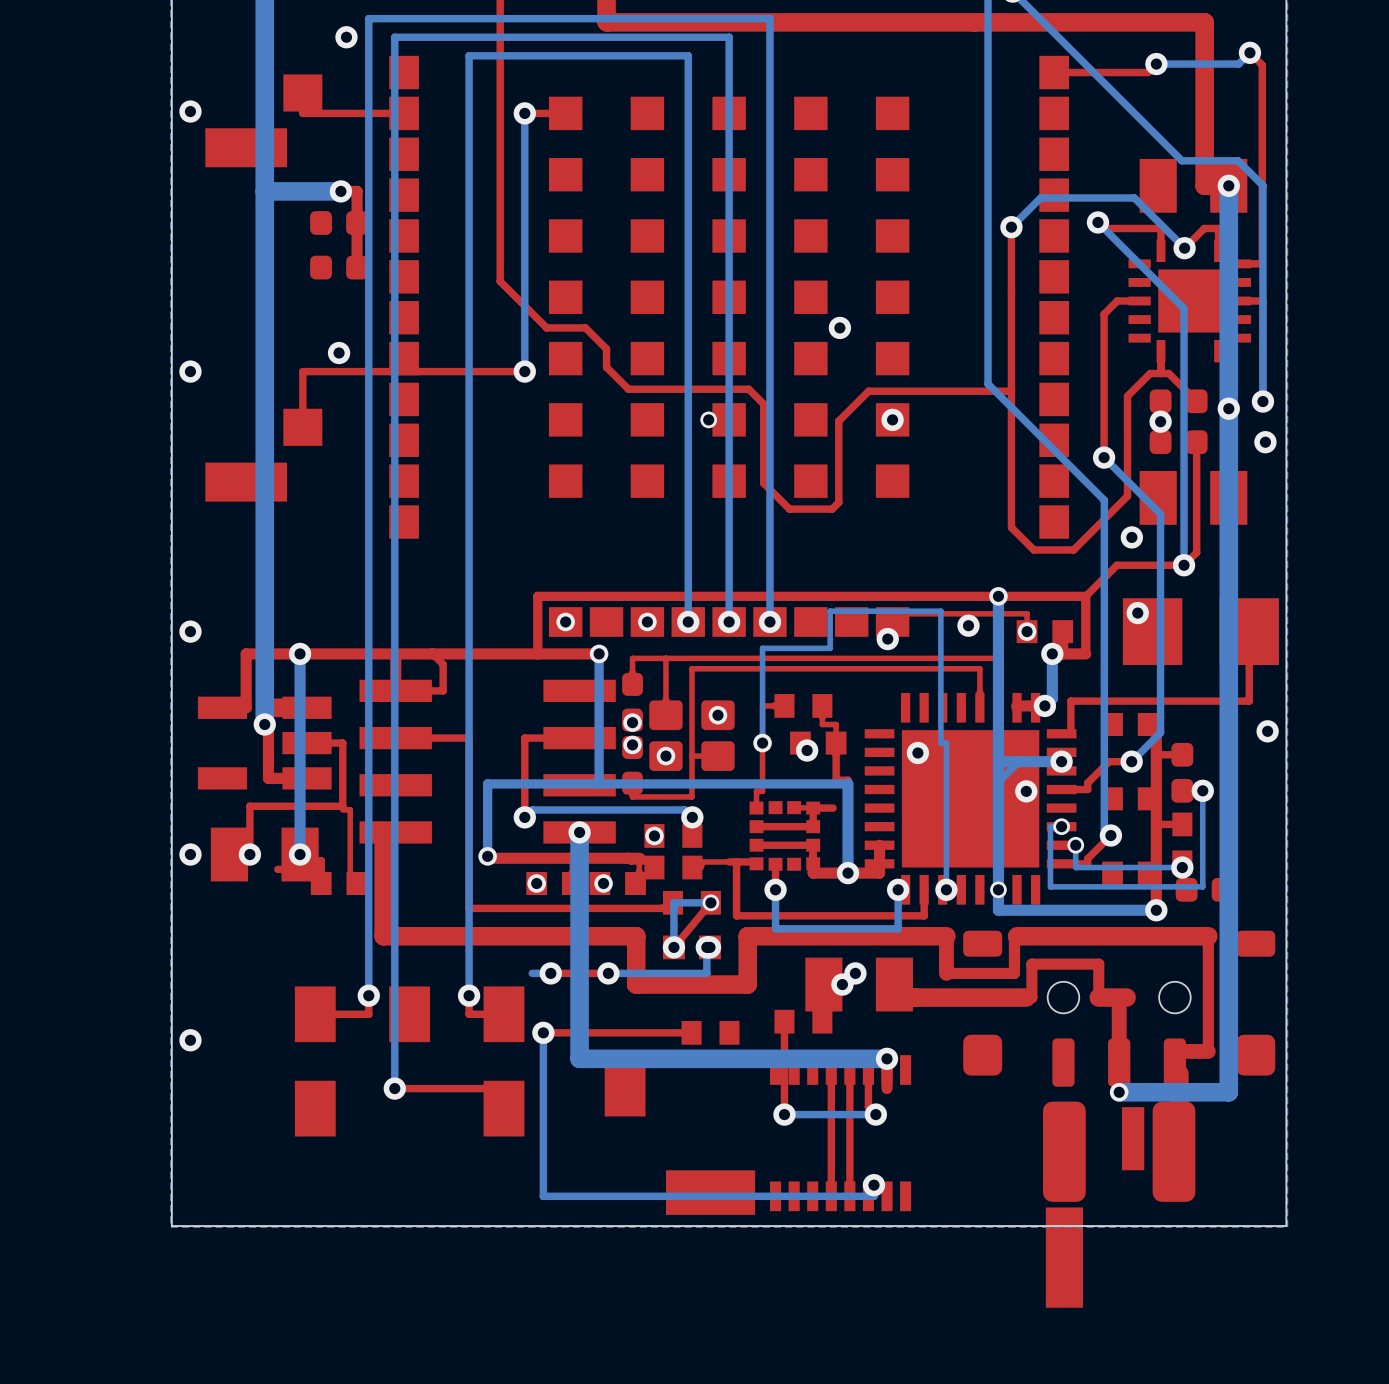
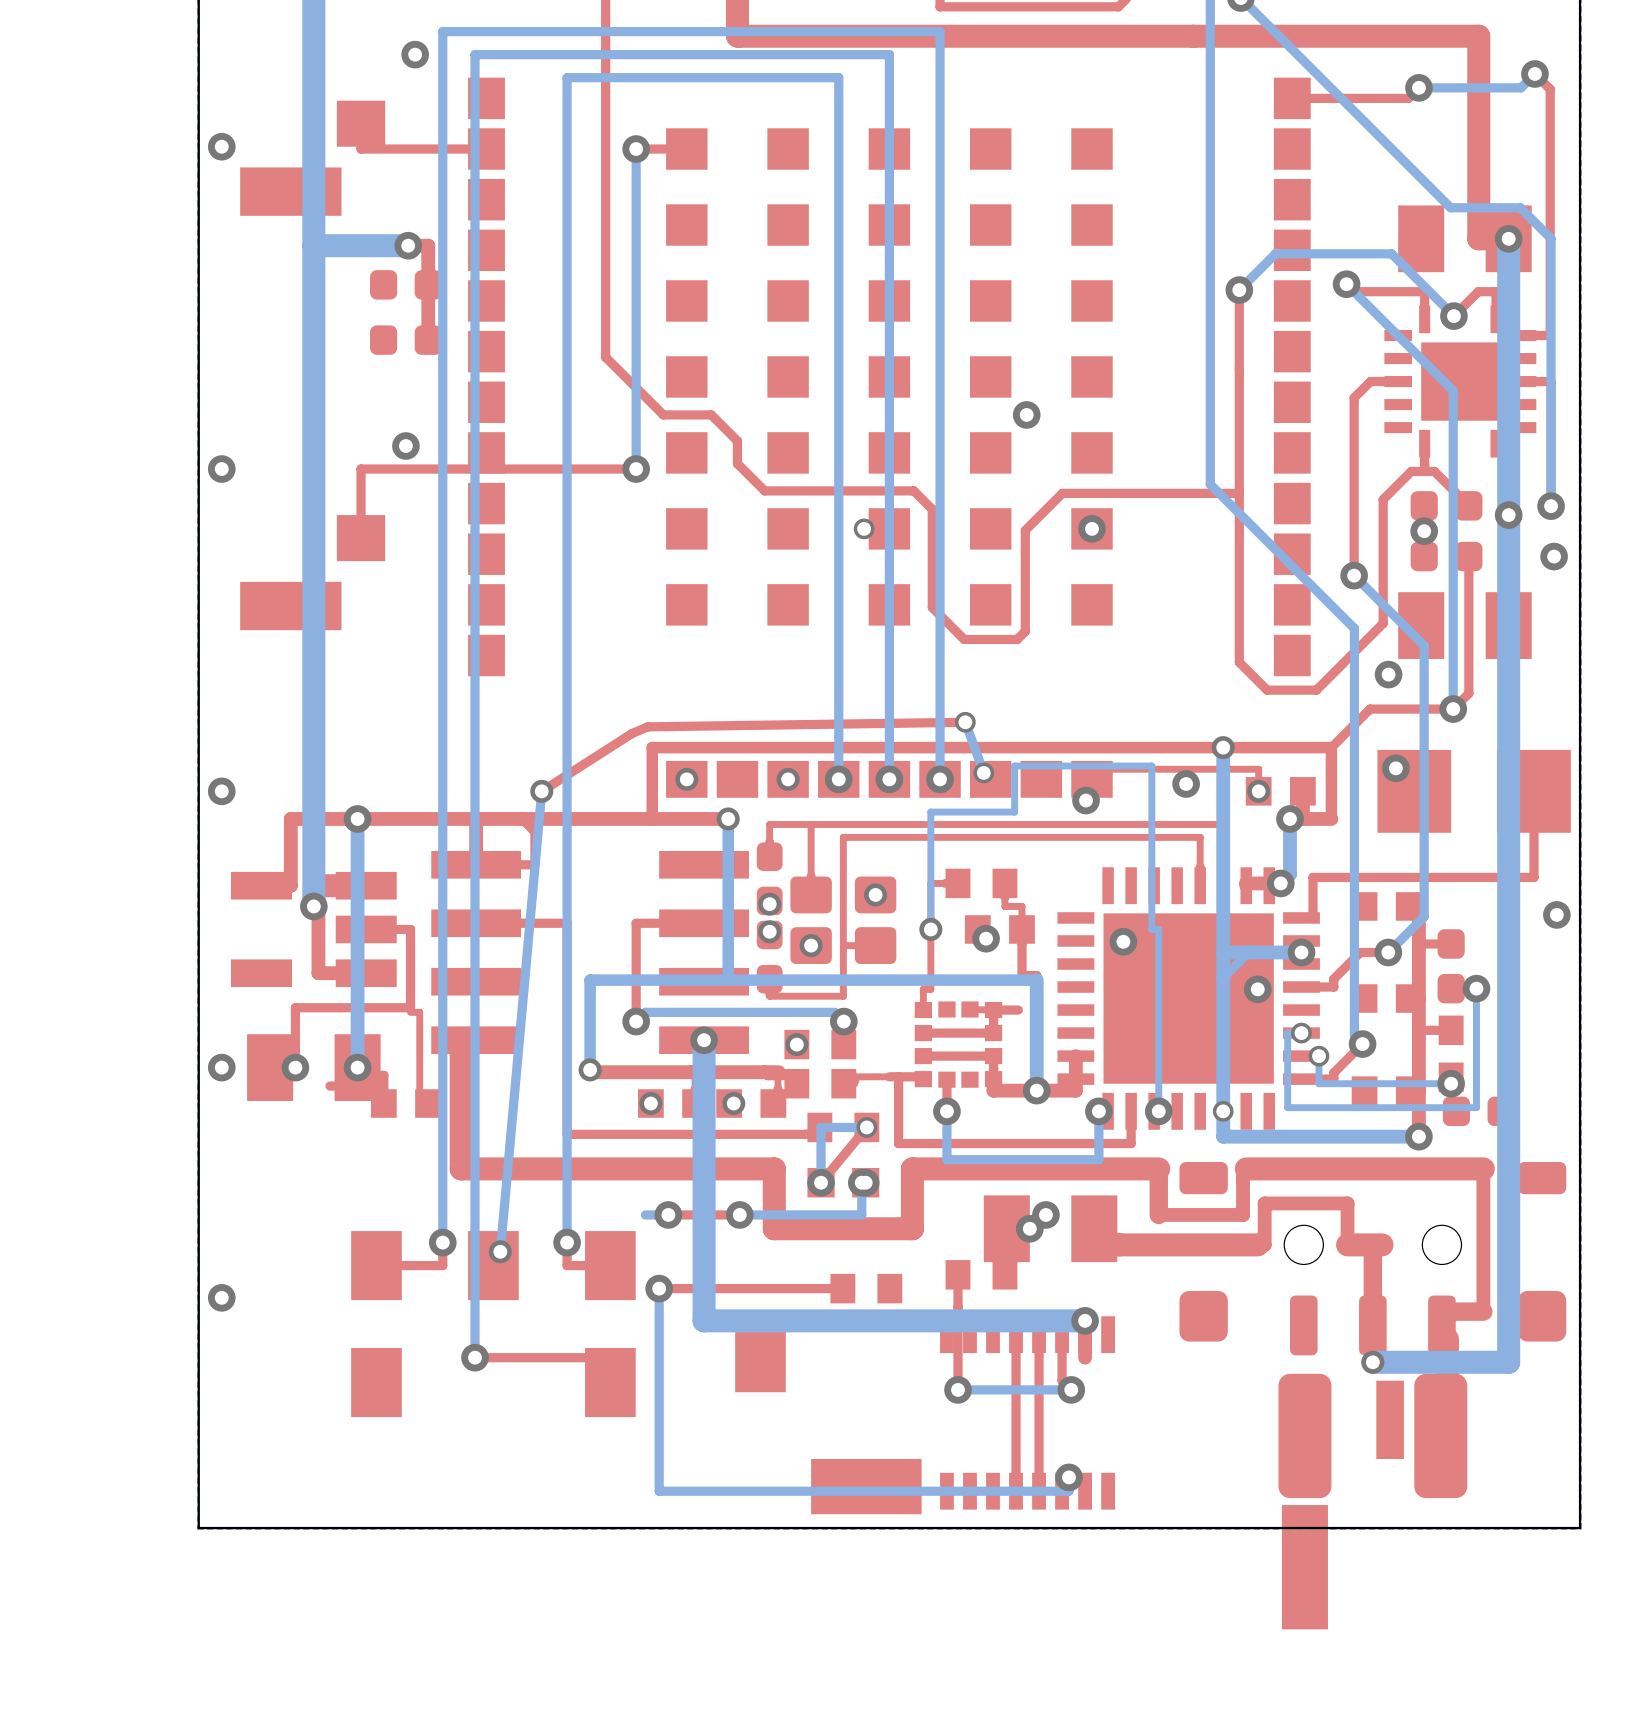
top track: none -> (965, 722) (647, 726) (631, 733) (541, 791)
bottom track: none -> (965, 722) (983, 772)
via: none -> (965, 722)
via: none -> (983, 772)
bottom track: none -> (541, 791) (500, 1251)
via: none -> (541, 791)
via: none -> (500, 1251)

